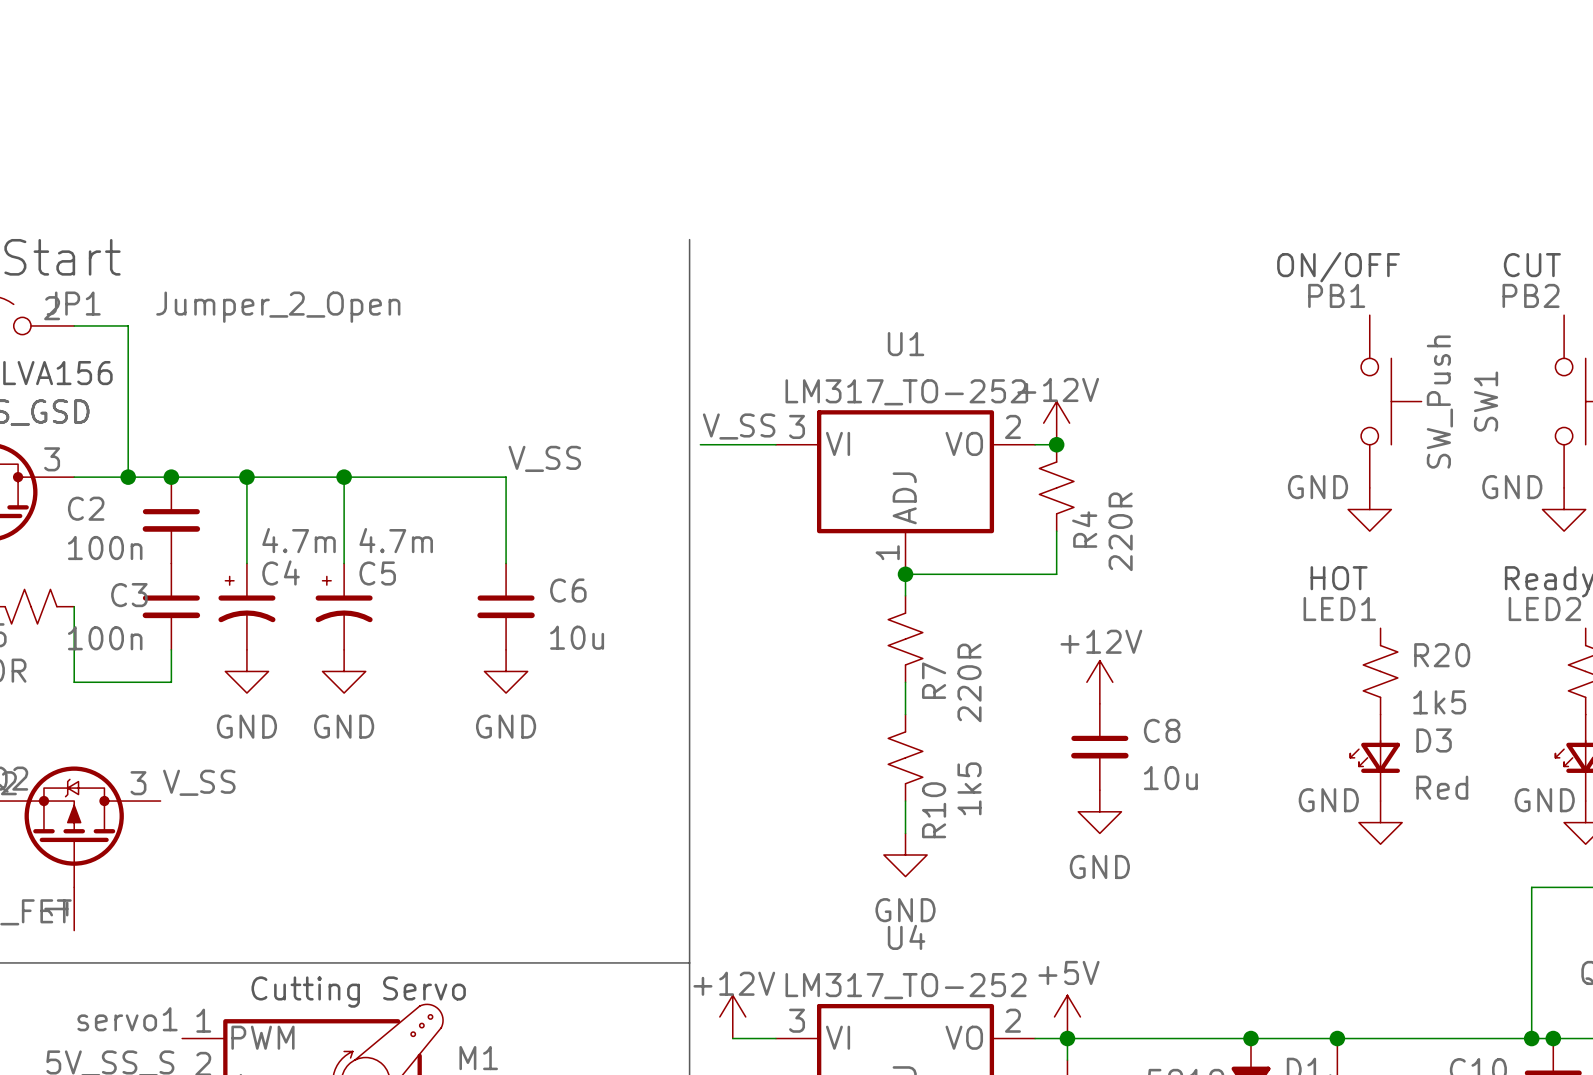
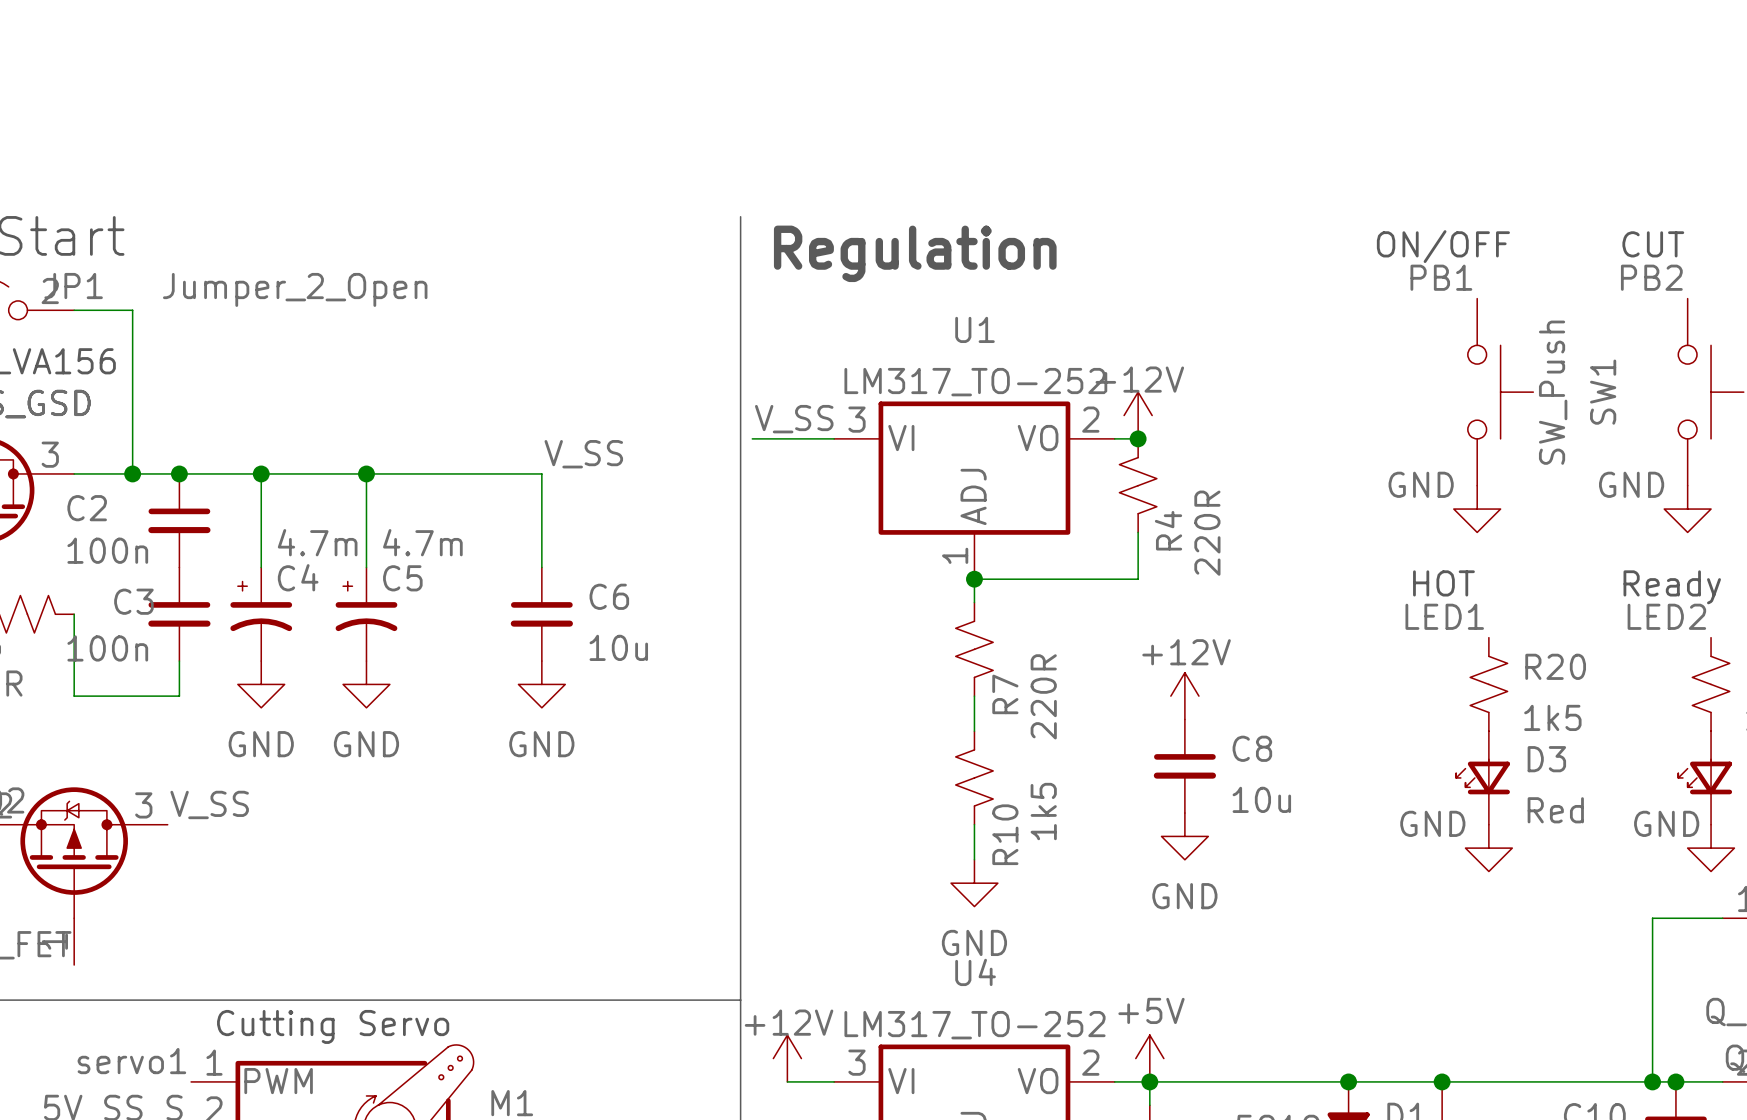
text: none -> Regulation (915, 253)
text position: Cutting Servo (358, 992) -> Cutting Servo (333, 1026)

